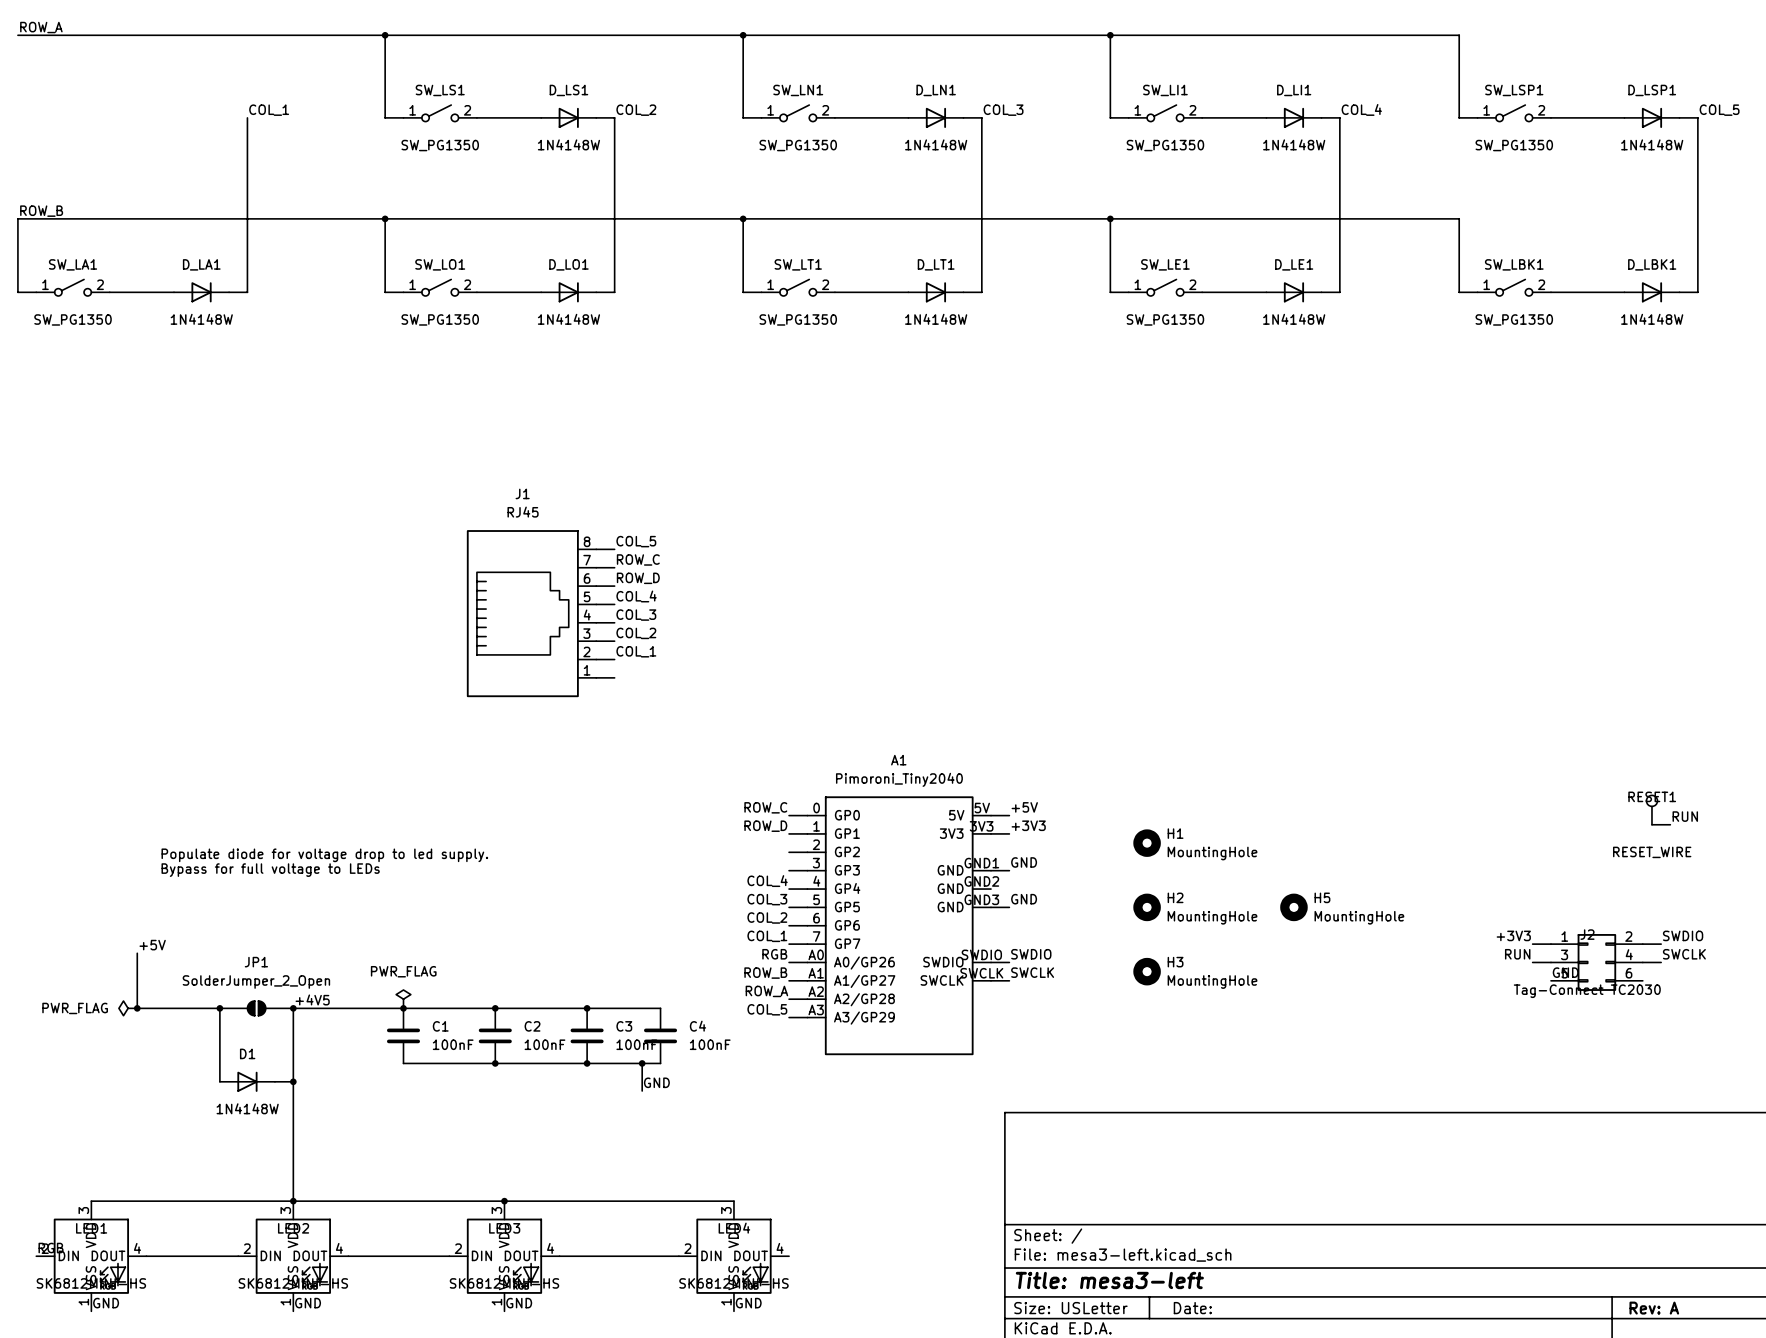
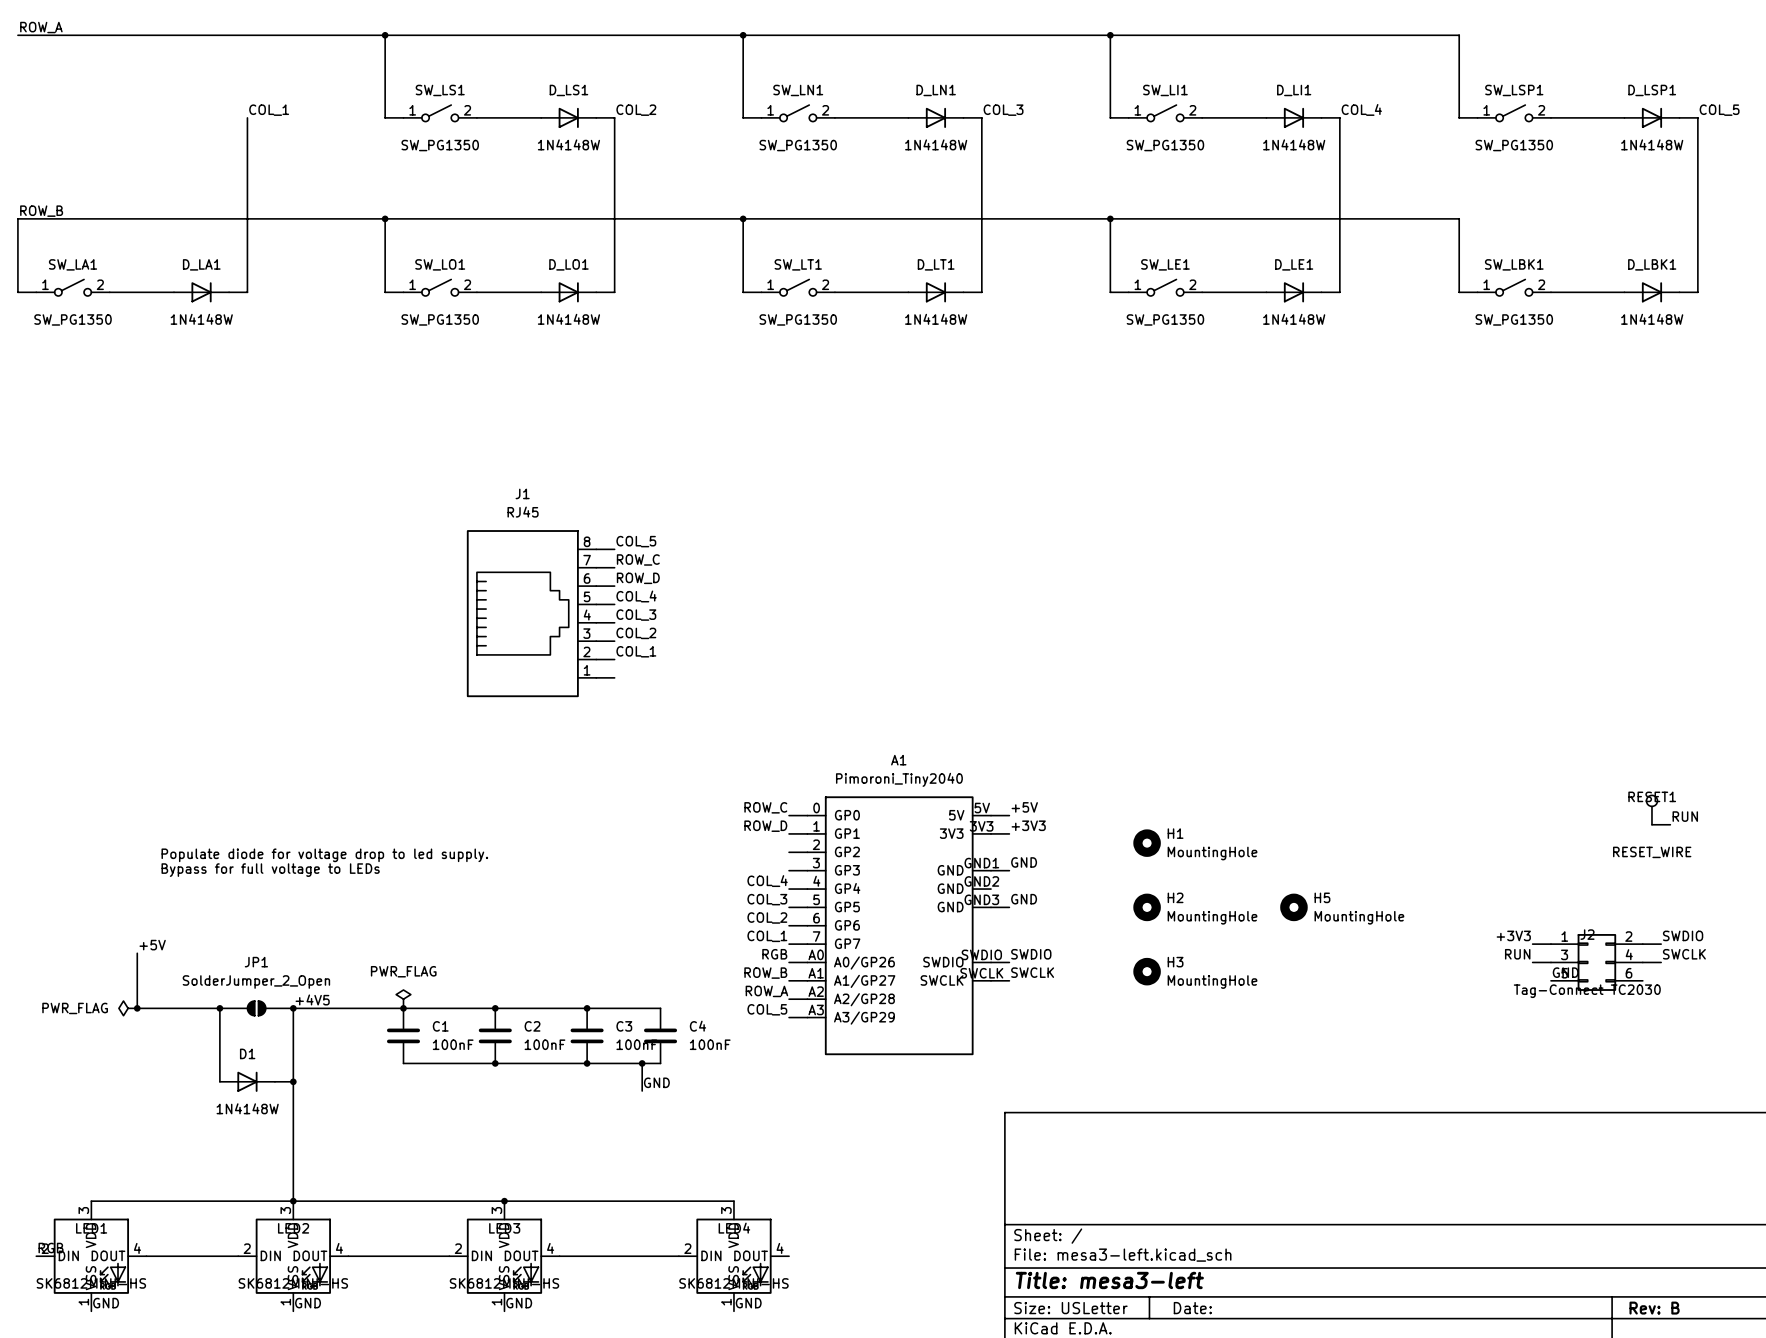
title block: Rev: A (1654, 1308) -> Rev: B (1654, 1308)

